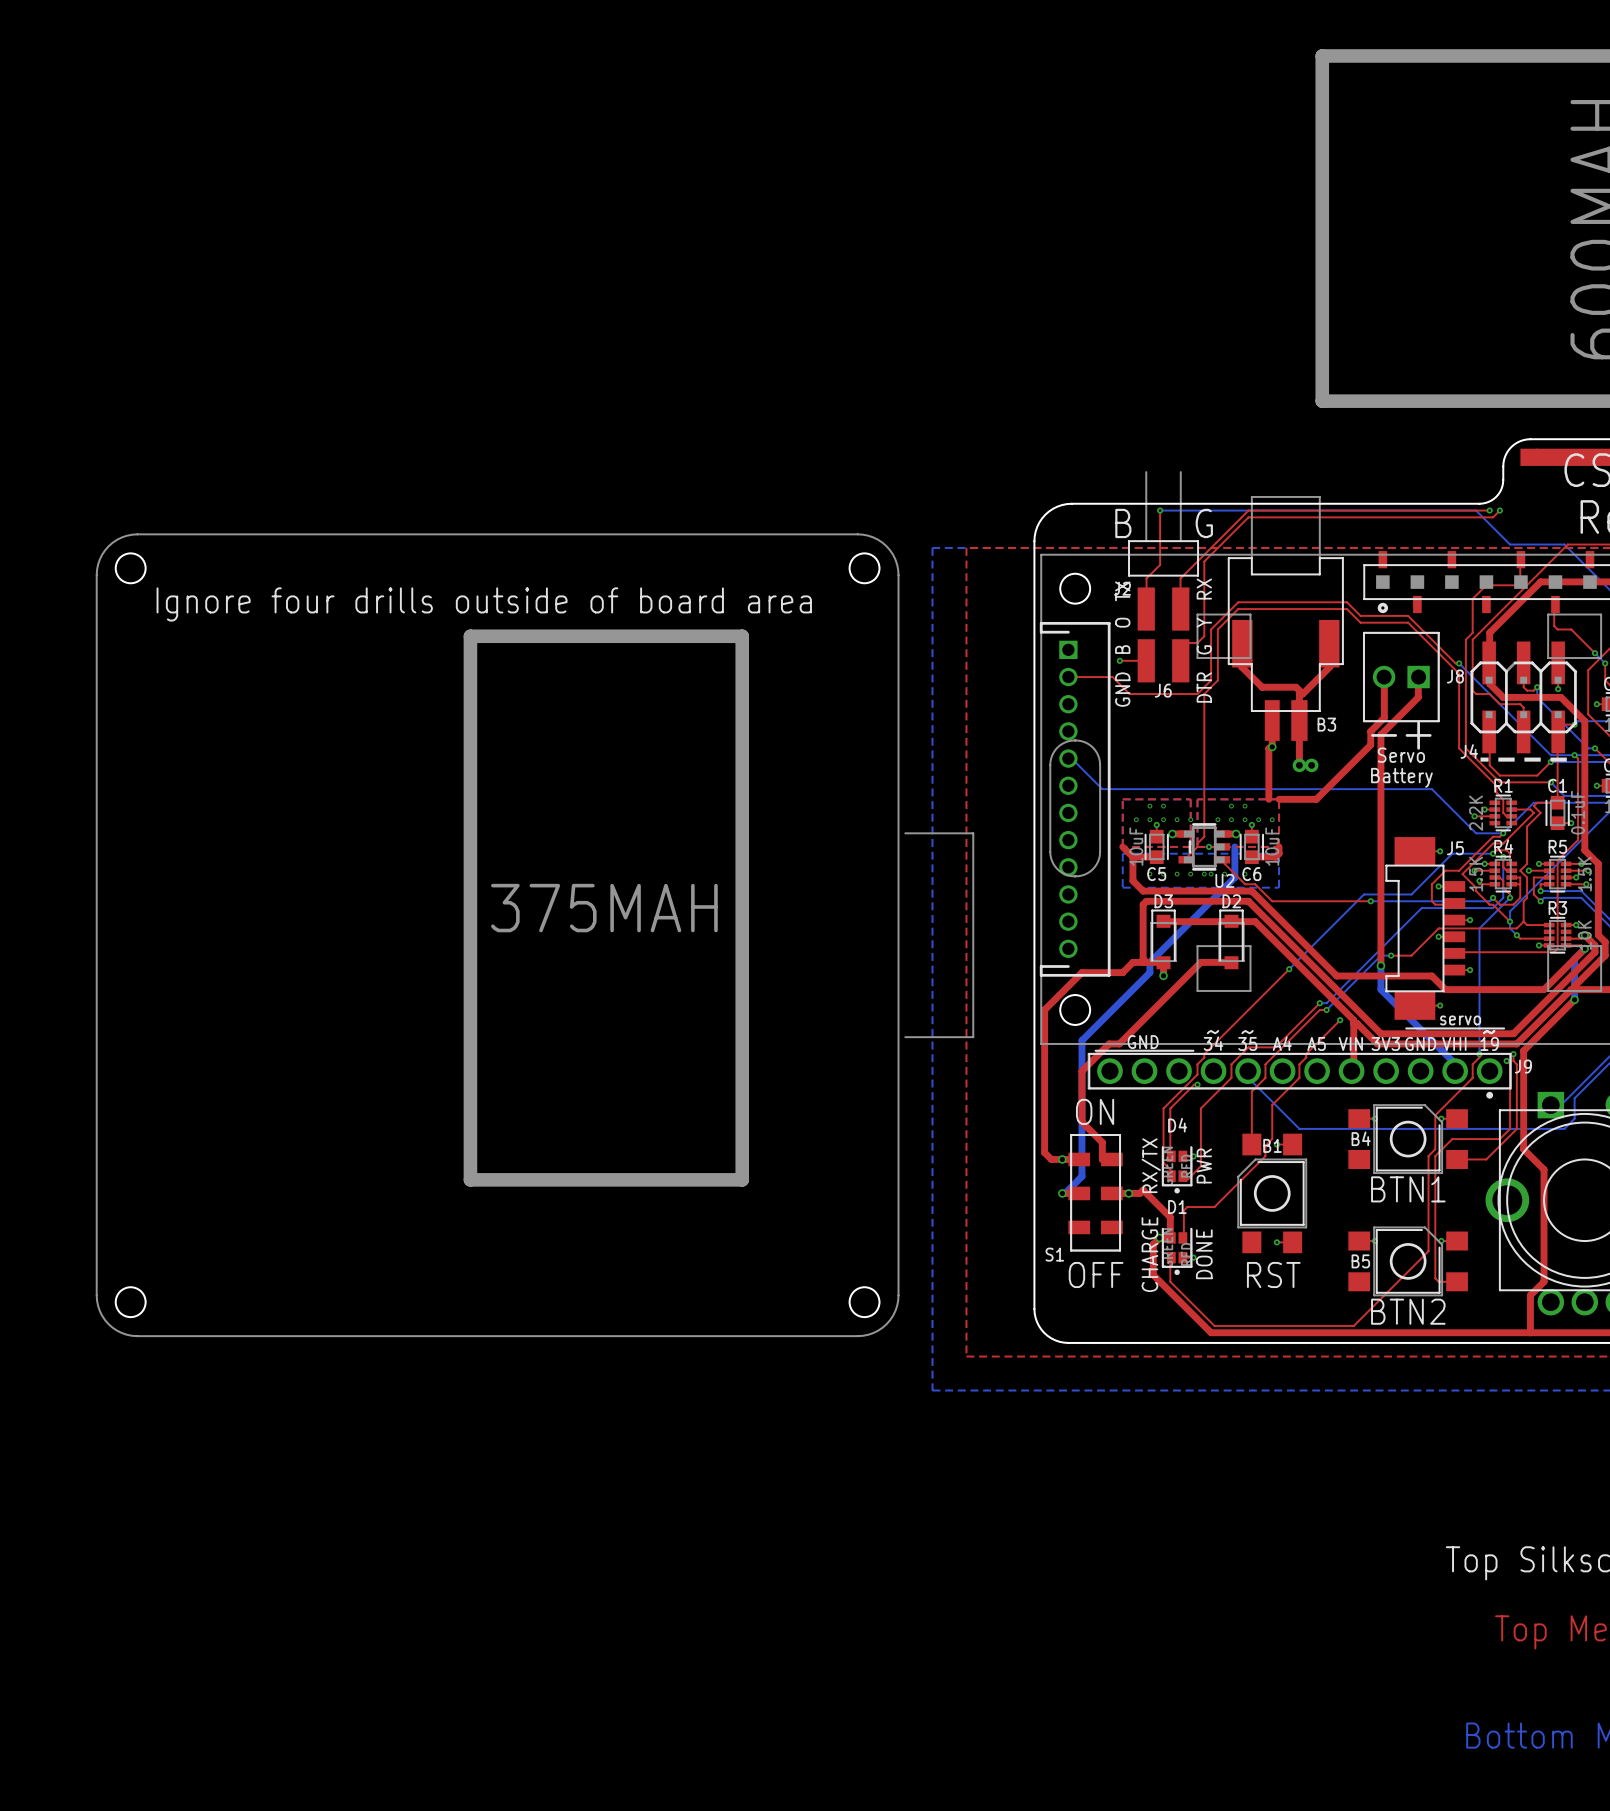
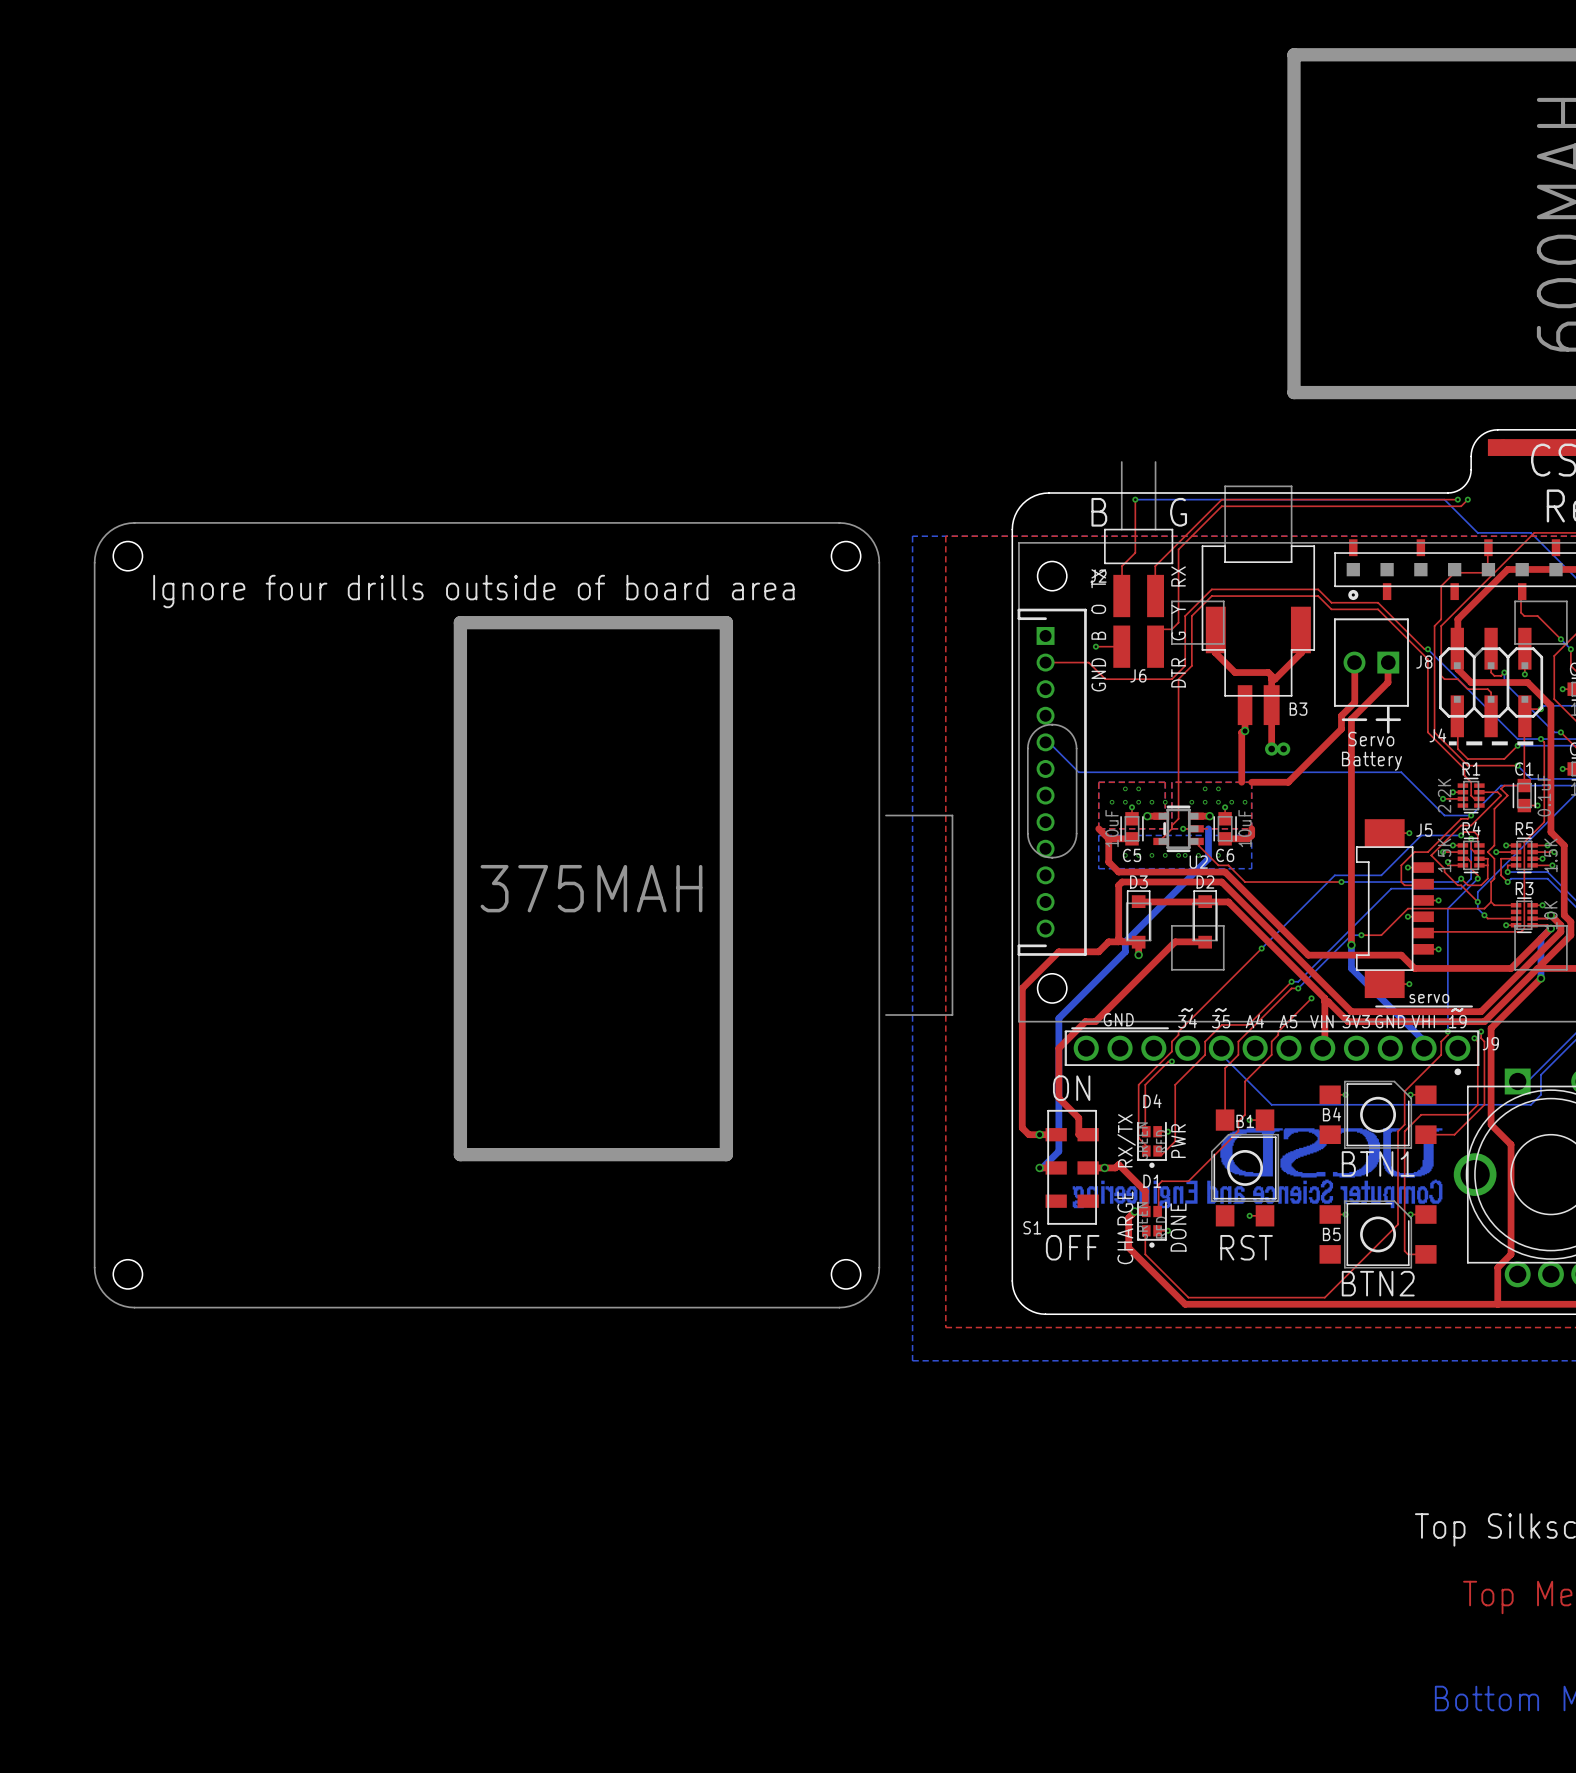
drawing: none -> [1072, 1128, 1443, 1209]

